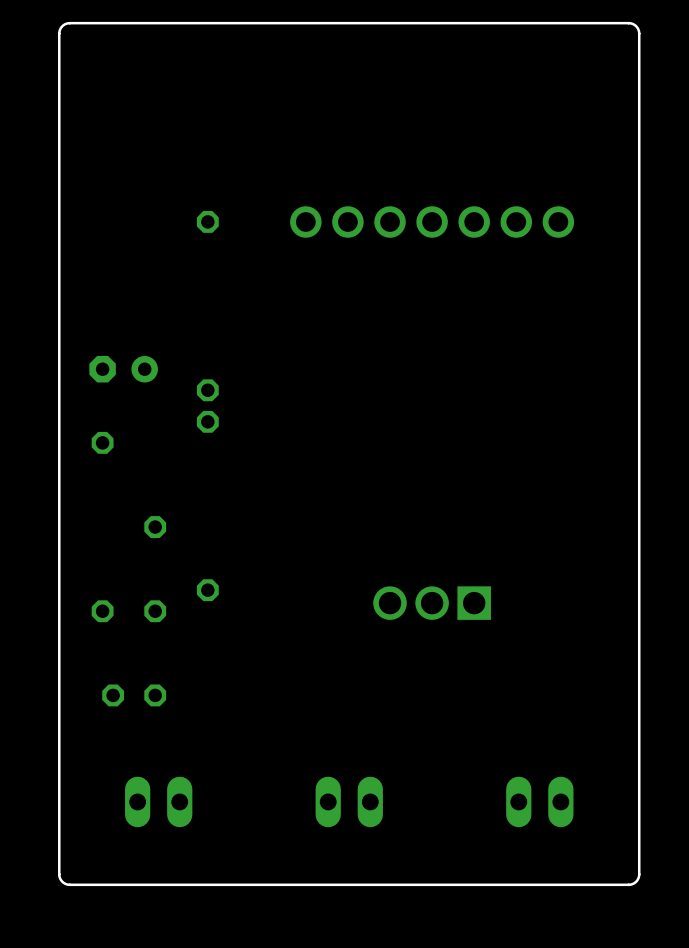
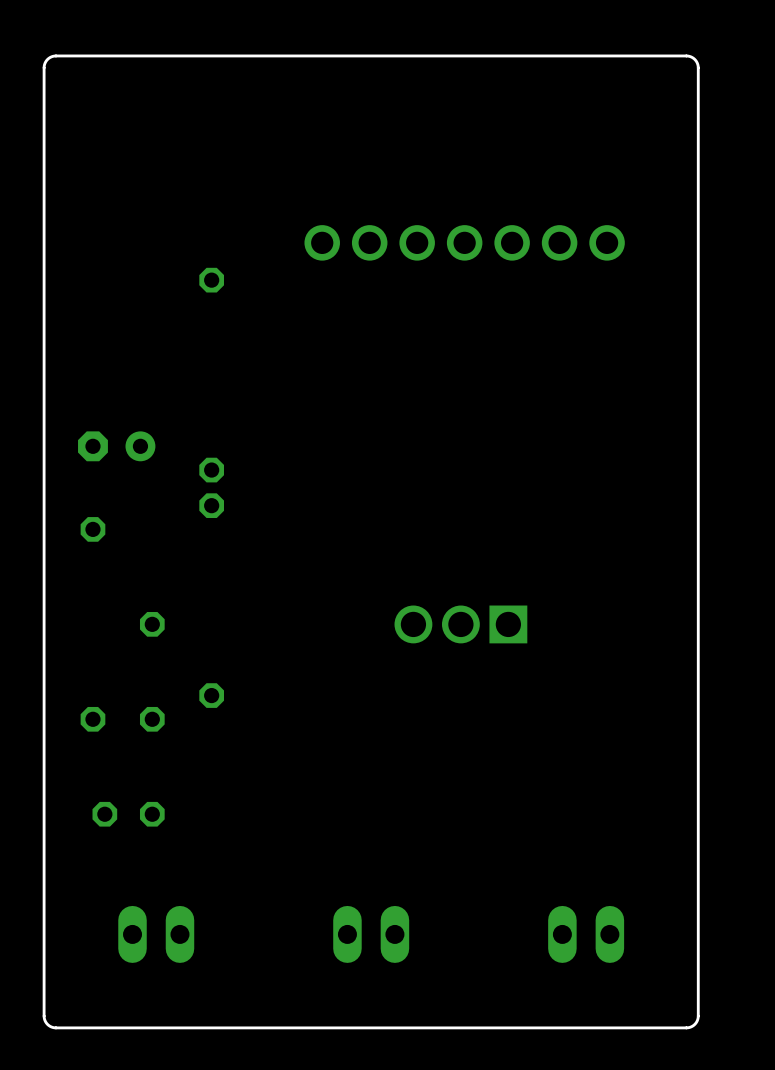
part position: (432, 222) -> (464, 242)
part position: (432, 603) -> (460, 624)

